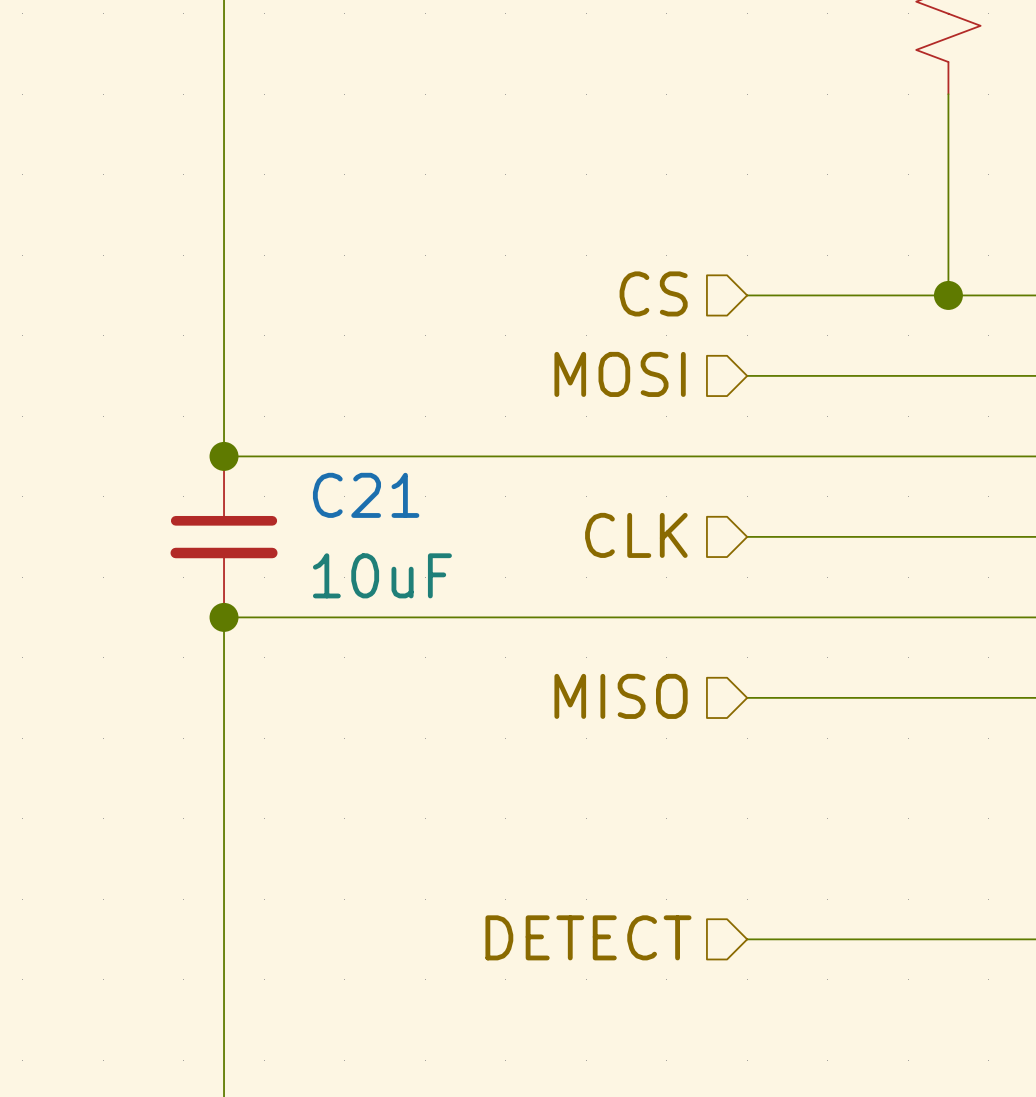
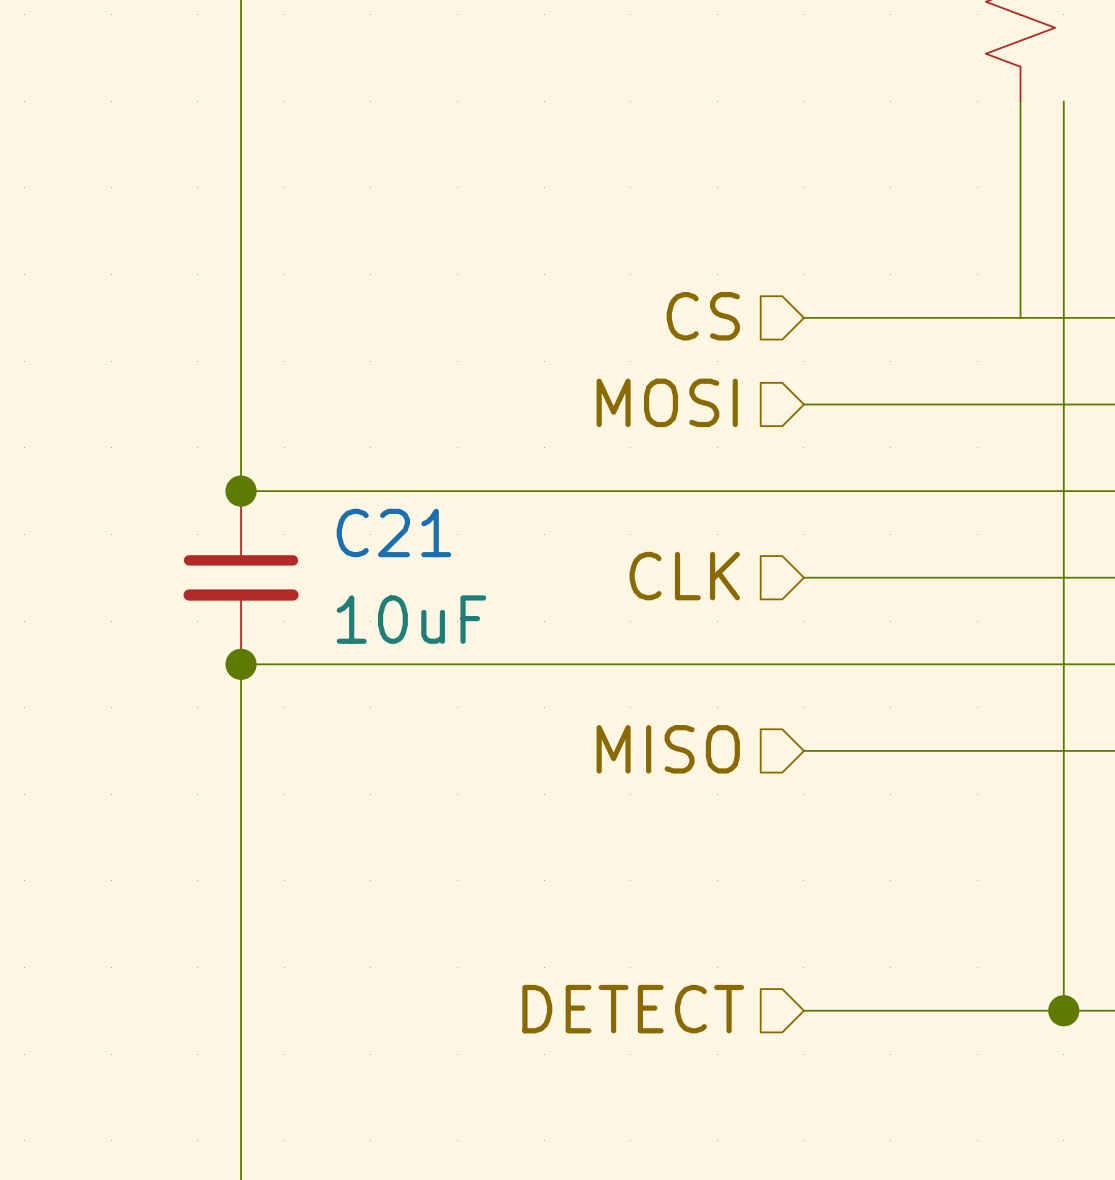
wire: none -> (1063, 101) (1063, 1010)
junction: (948, 295) -> none
junction: none -> (1063, 1010)

